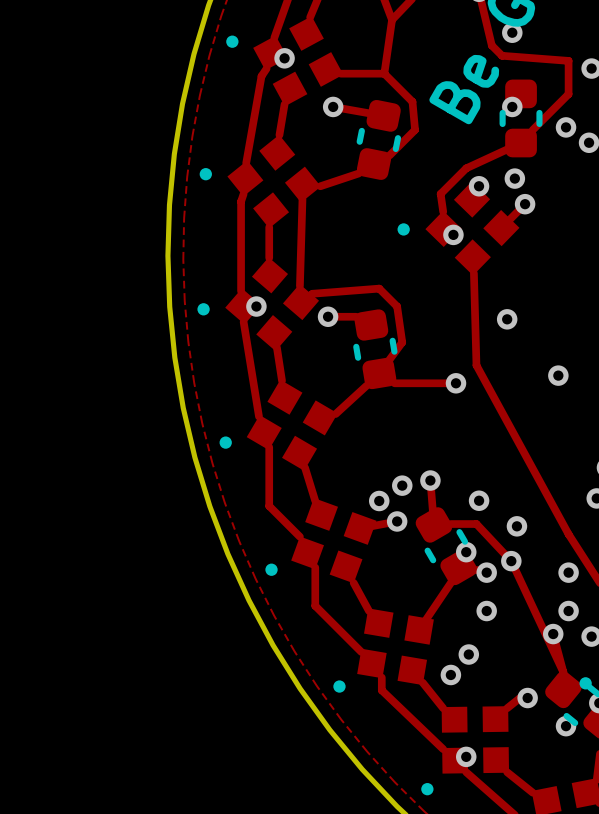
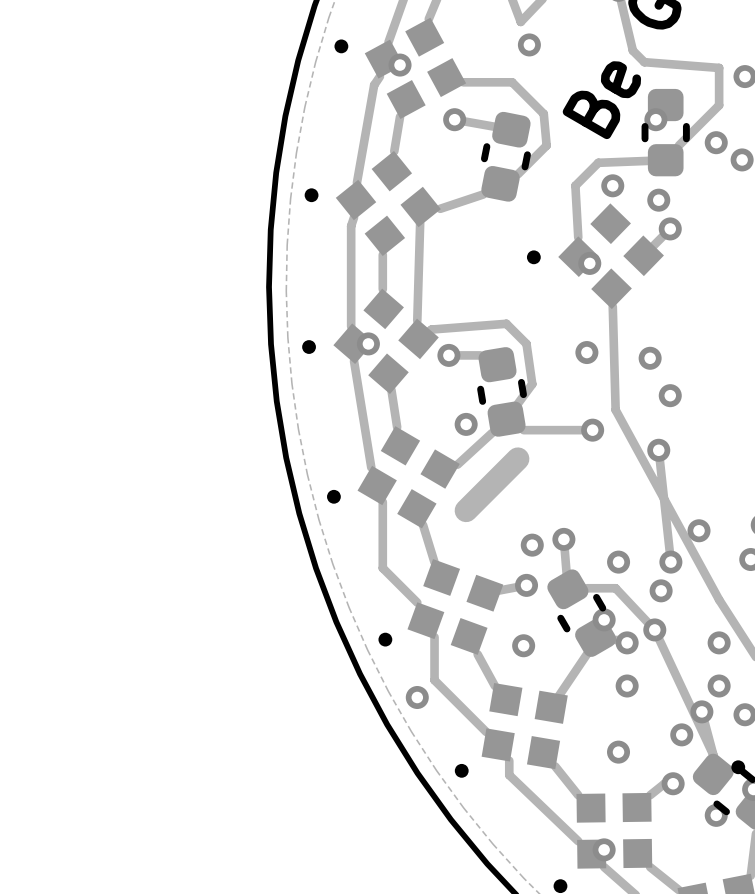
track: (392, 19) (384, 73) -> none
via: (512, 32) -> none
via: none -> (529, 44)
track: (521, 143) (466, 168) (440, 193) (443, 211) -> (665, 160) (598, 162) (575, 185) (578, 237)
via position: (479, 186) -> (612, 185)
via: none -> (586, 352)
via: none -> (670, 395)
via: (558, 375) -> none
via: none -> (466, 424)
track: none -> (658, 450) (670, 562)
via: none -> (658, 450)
track: none -> (517, 458) (466, 510)
via: none -> (699, 530)
via: (379, 500) -> none
via: none -> (670, 562)
via: none -> (523, 645)
via: none -> (417, 697)
via position: (468, 654) -> (618, 752)
via: none -> (681, 734)
via: (450, 674) -> none

